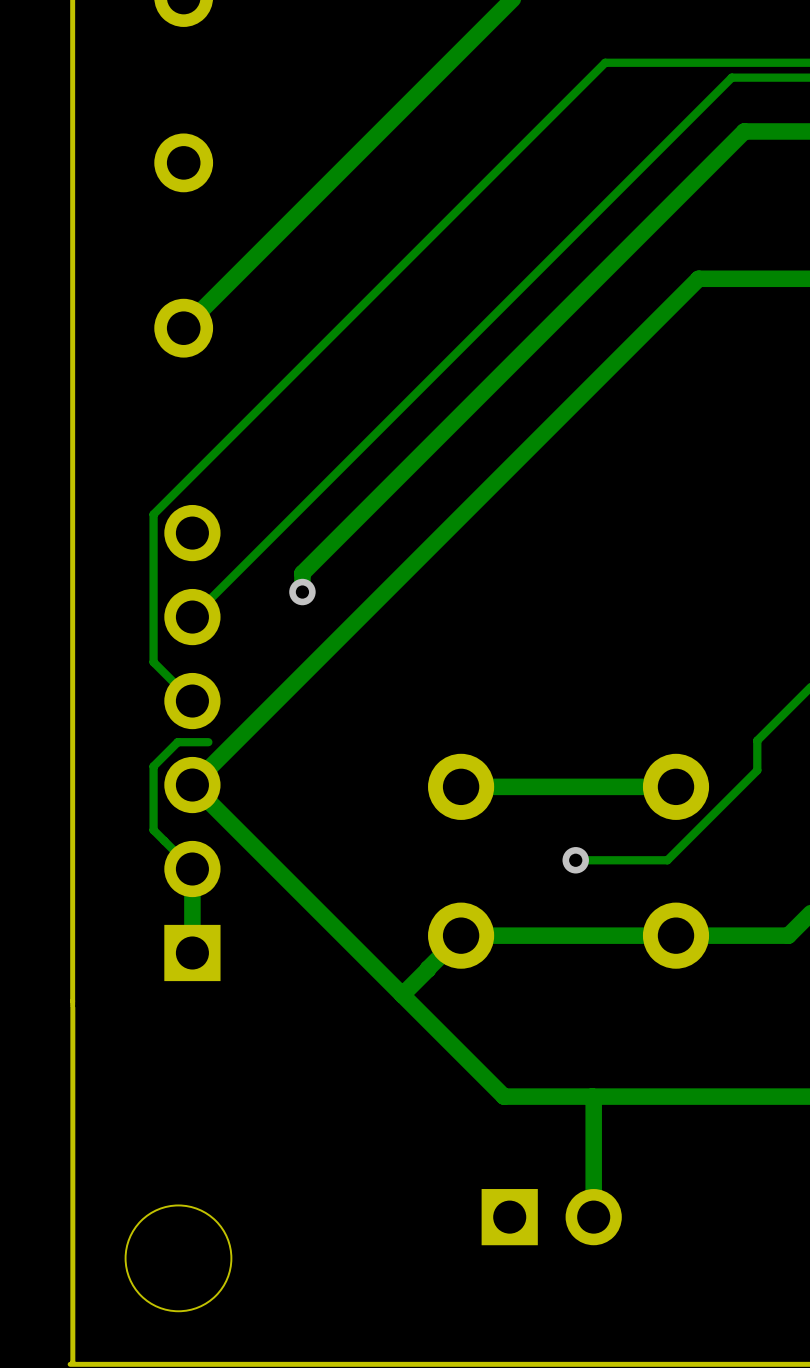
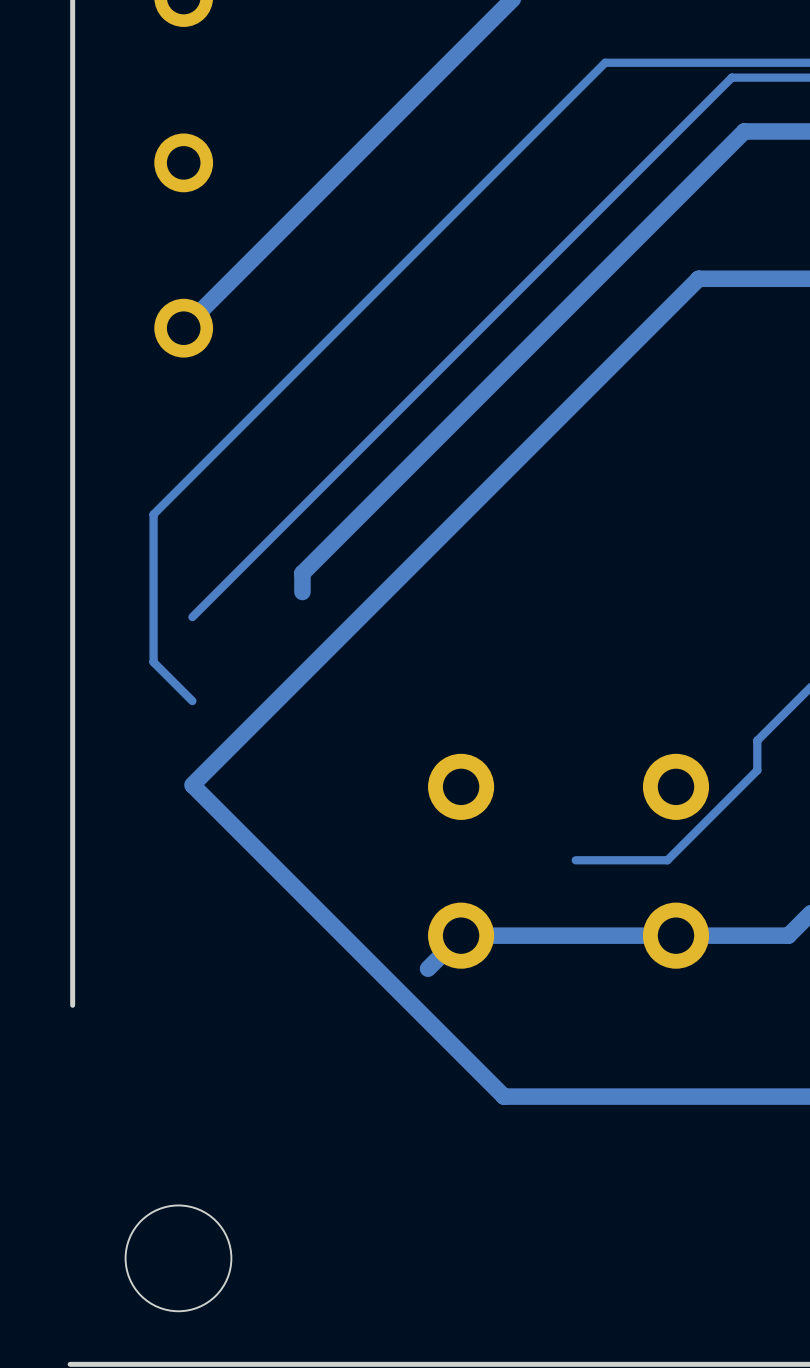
via: (302, 592) -> none
track: (208, 742) (177, 742) (153, 766) (153, 830) (192, 869) (192, 952) -> none
part: (192, 743) -> none
track: (676, 786) (461, 786) -> none
via: (575, 860) -> none
track: (428, 969) (402, 994) -> none
board edge: (72, 1007) (72, 1363) -> none
track: (592, 1096) (593, 1217) -> none
part: (551, 1217) -> none

